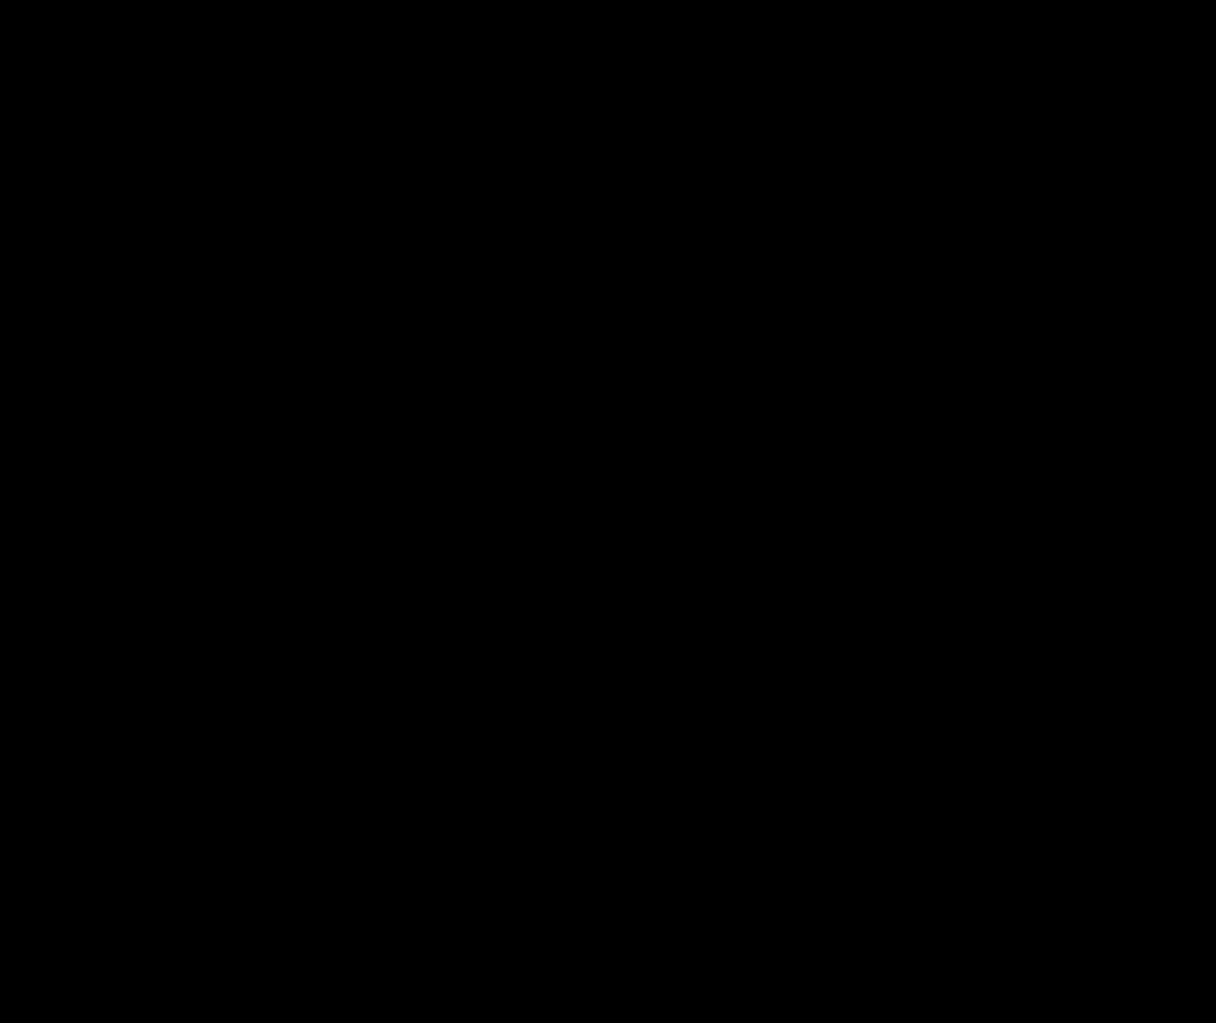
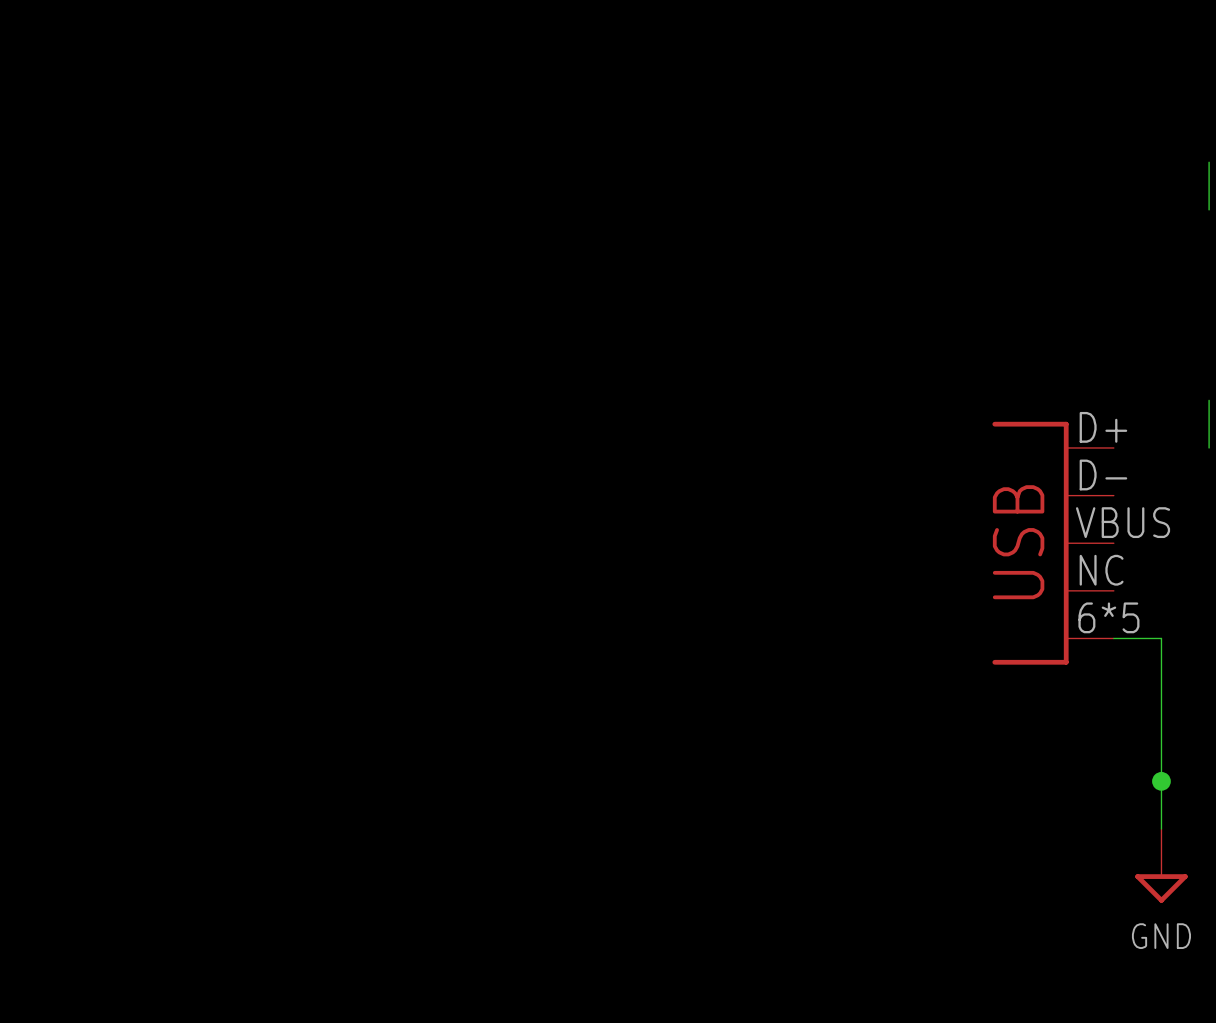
wire: none -> (1209, 162) (1209, 209)
wire: none -> (1209, 400) (1209, 447)
part: none -> (1053, 543)
wire: none -> (1113, 638) (1161, 638) (1161, 828)
junction: none -> (1161, 781)
power symbol: none -> GND (1161, 865)

